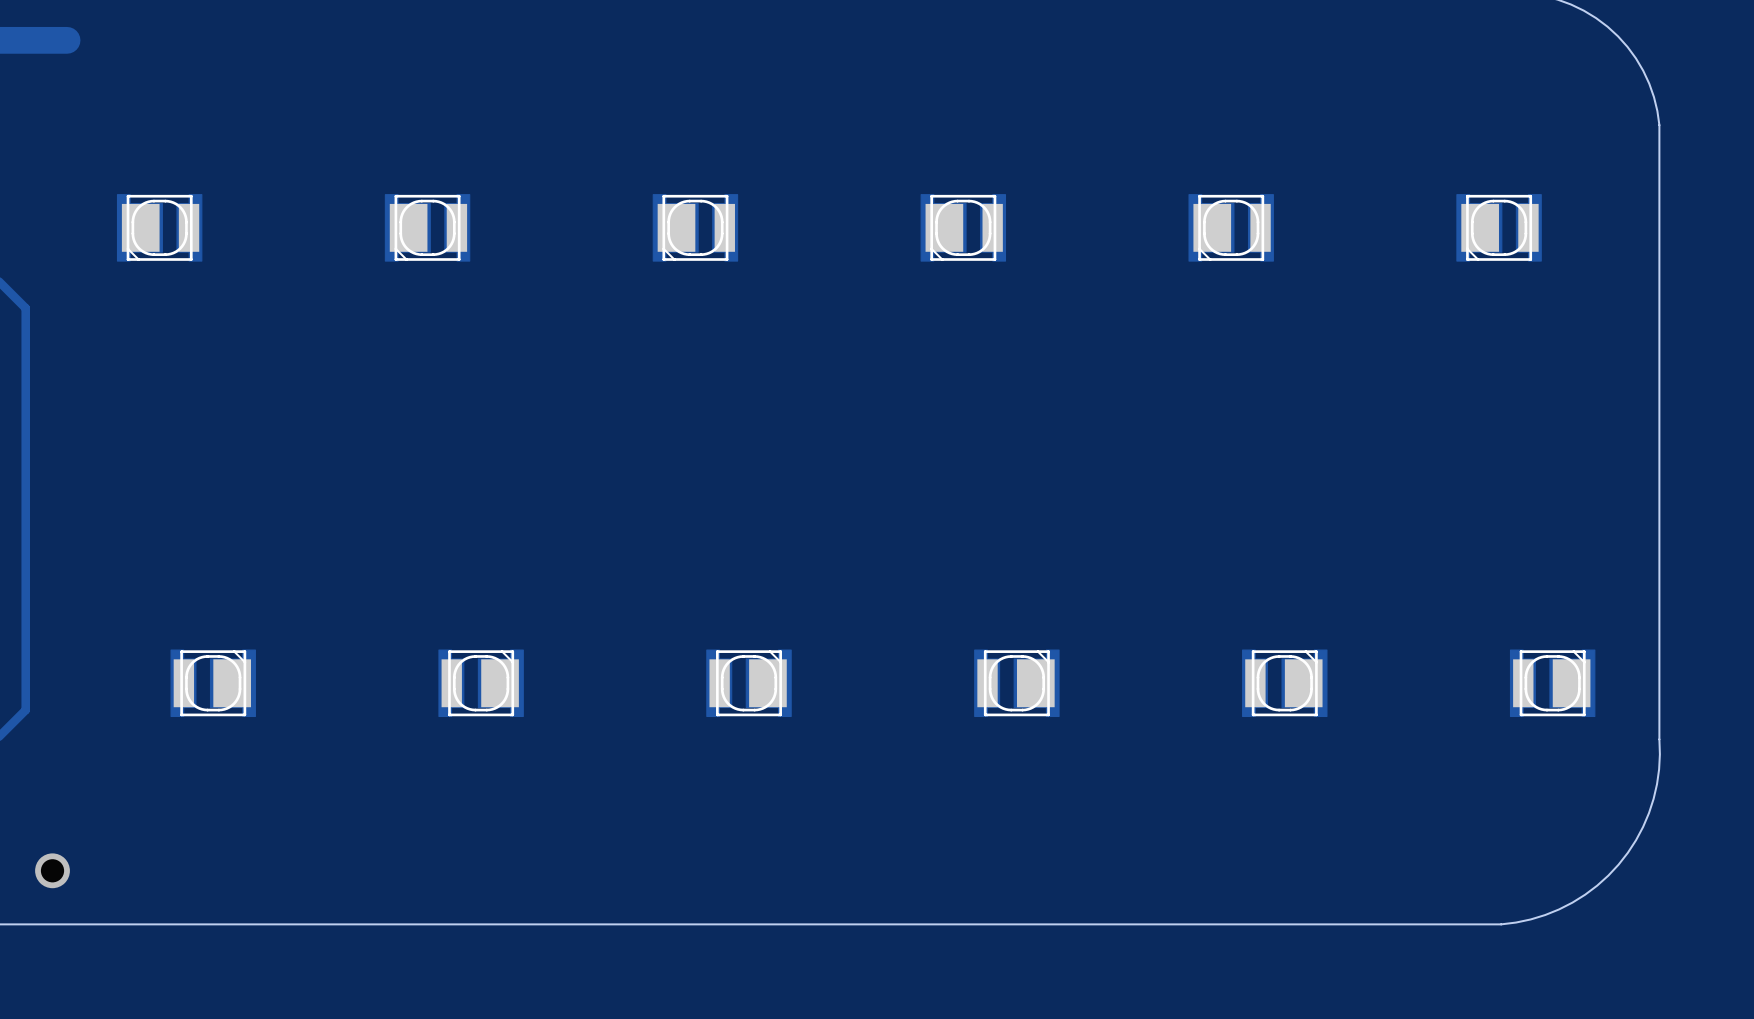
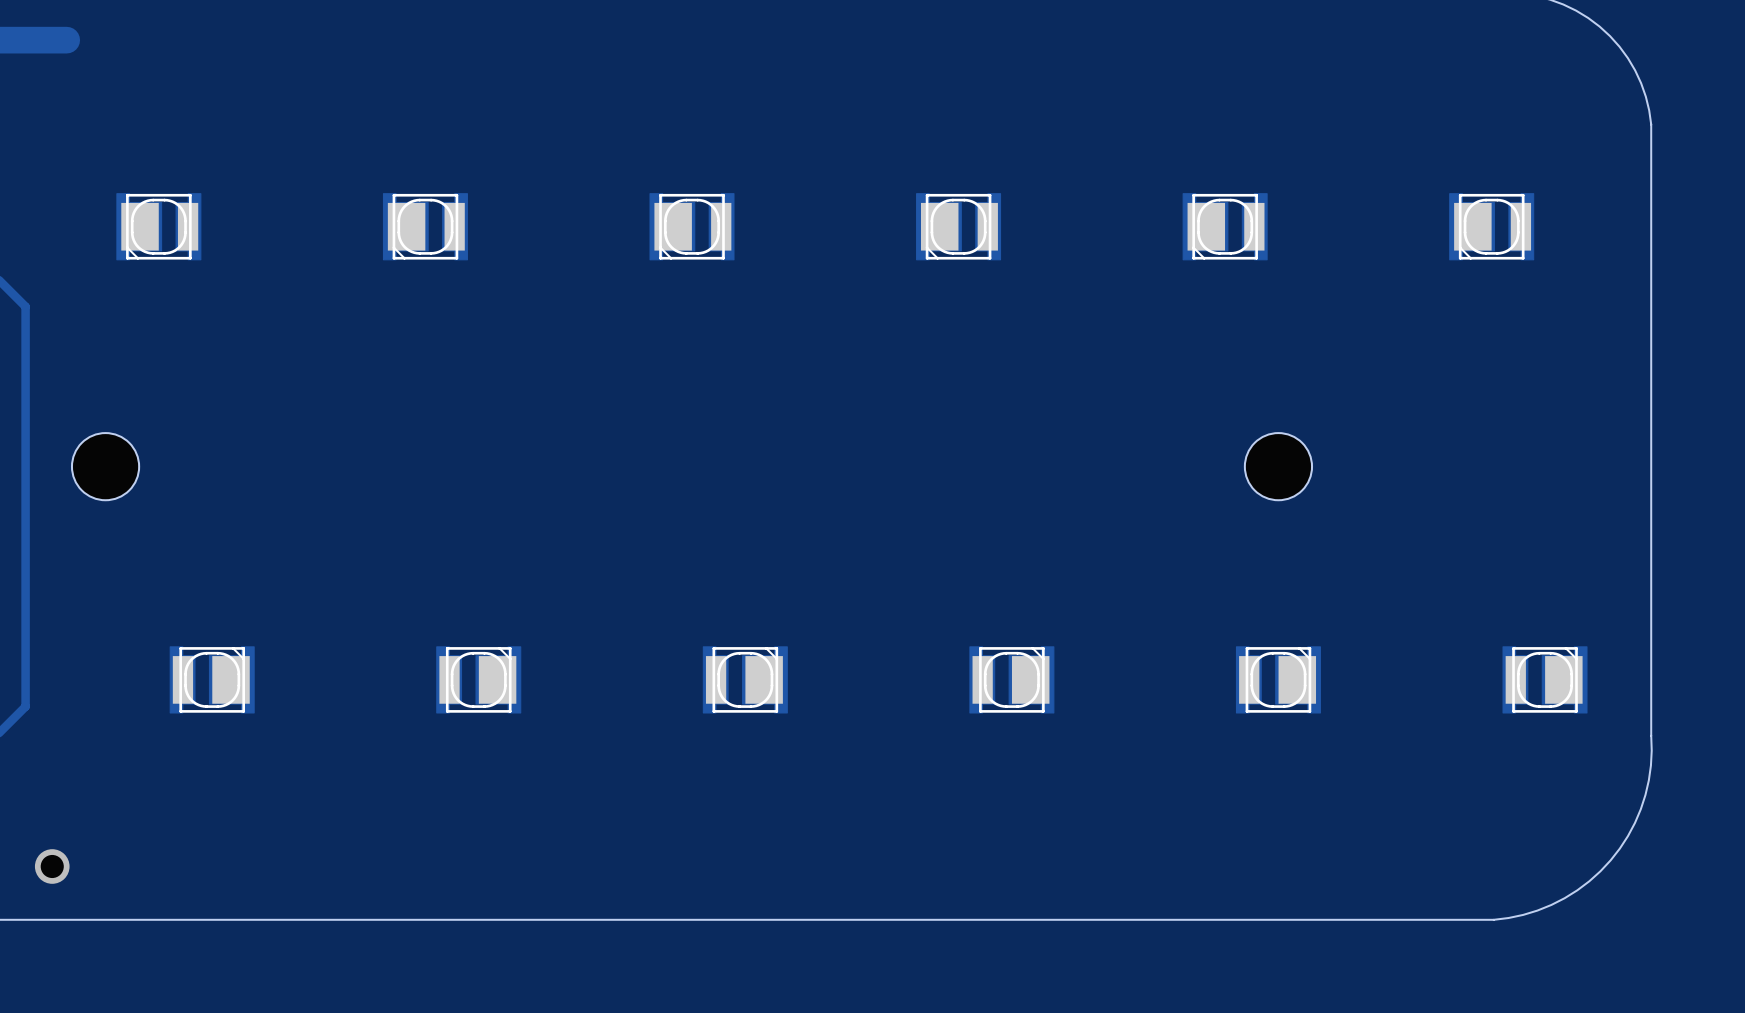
hole: none -> (105, 466)
hole: none -> (1278, 466)

